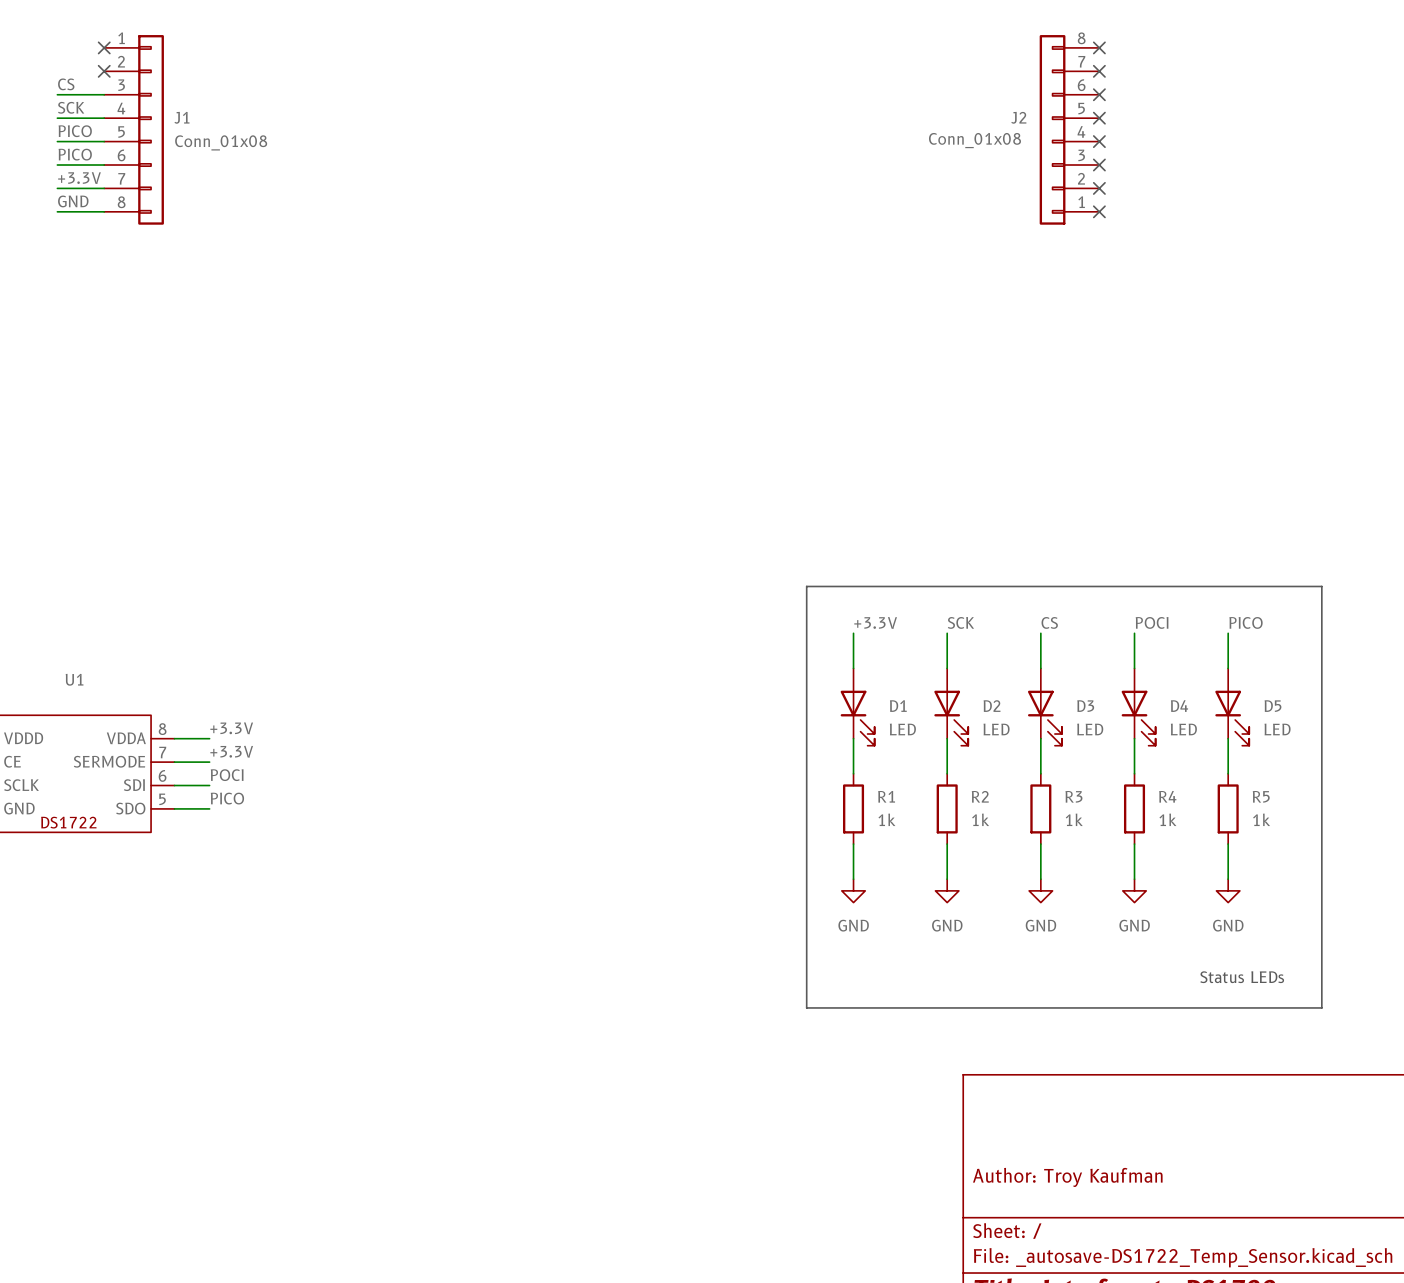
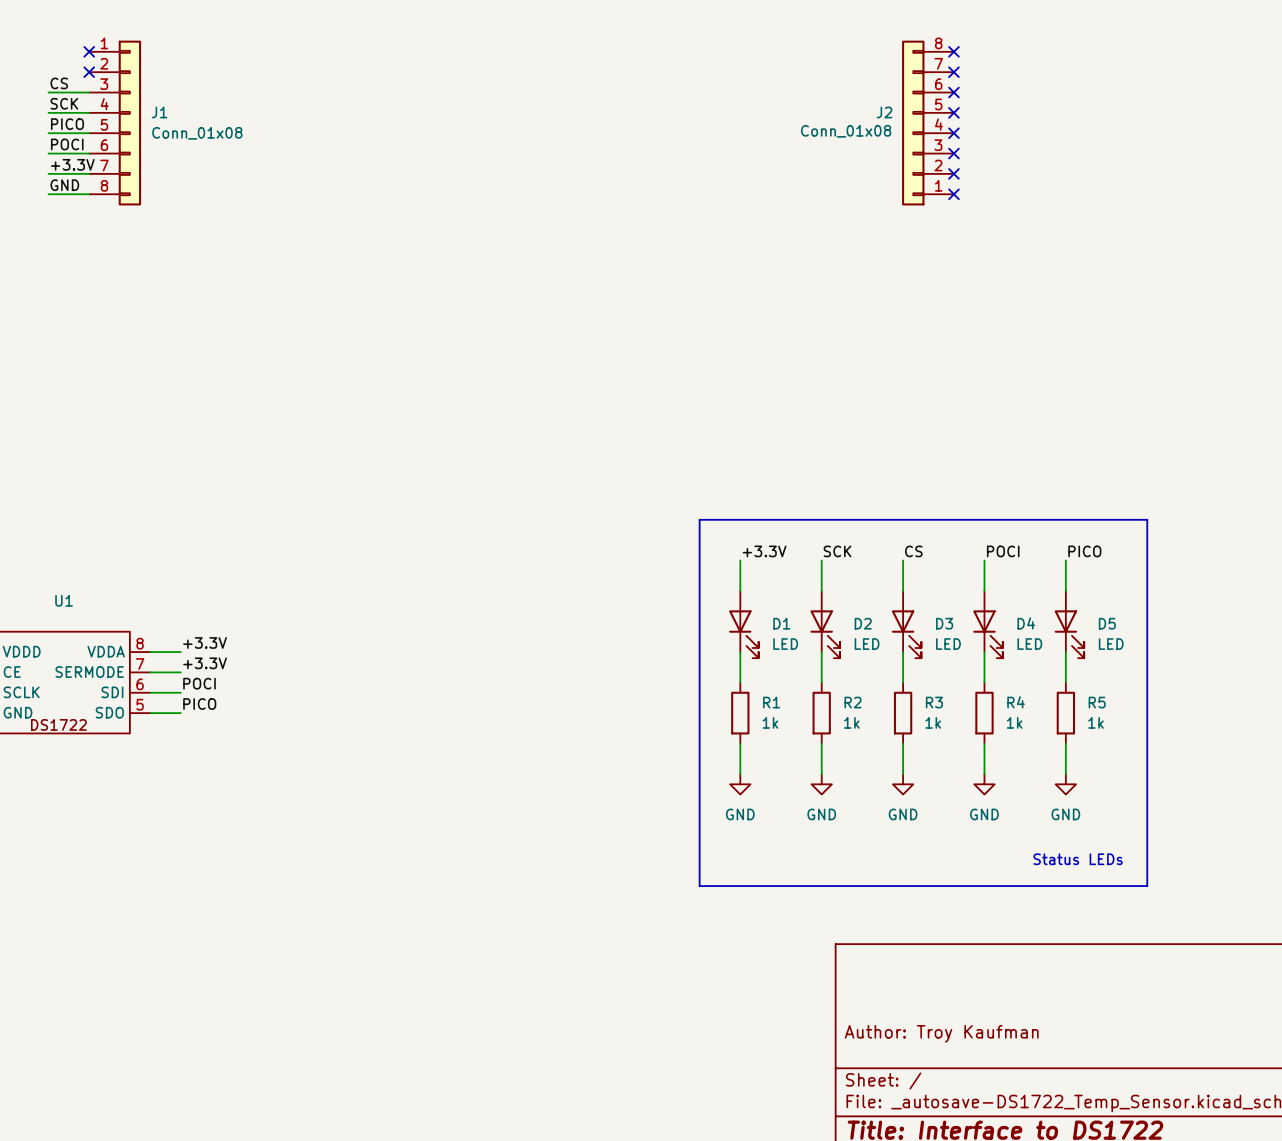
label: PICO (75, 154) -> POCI (67, 144)

